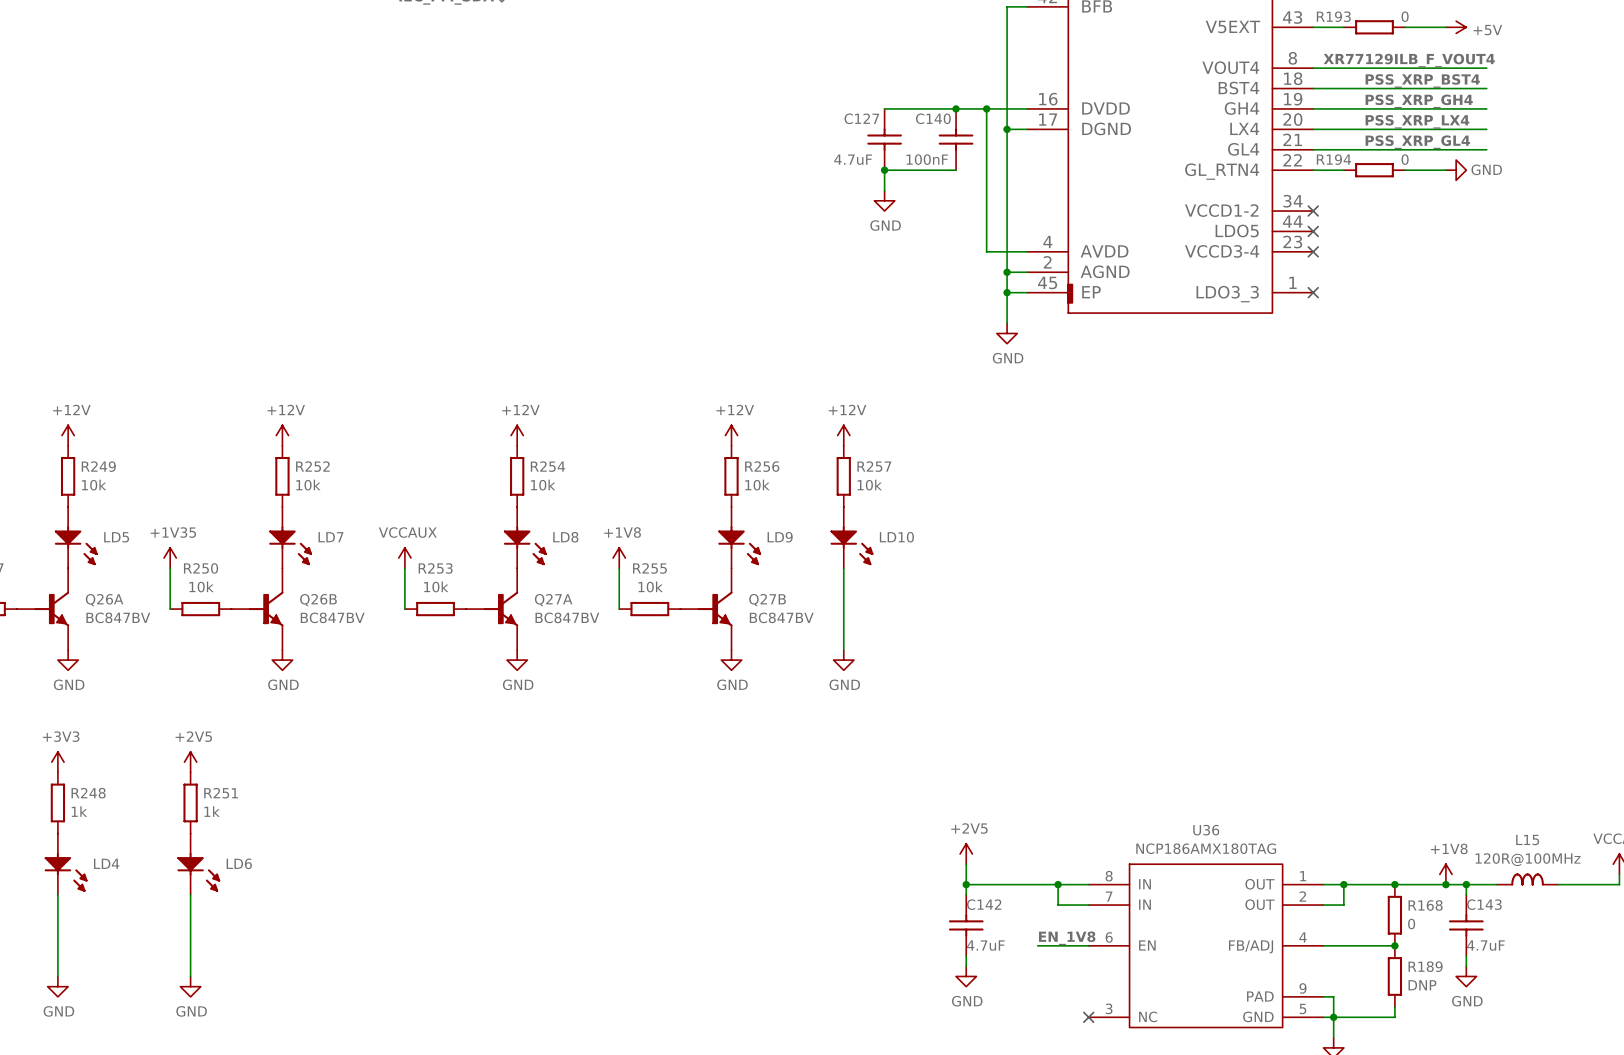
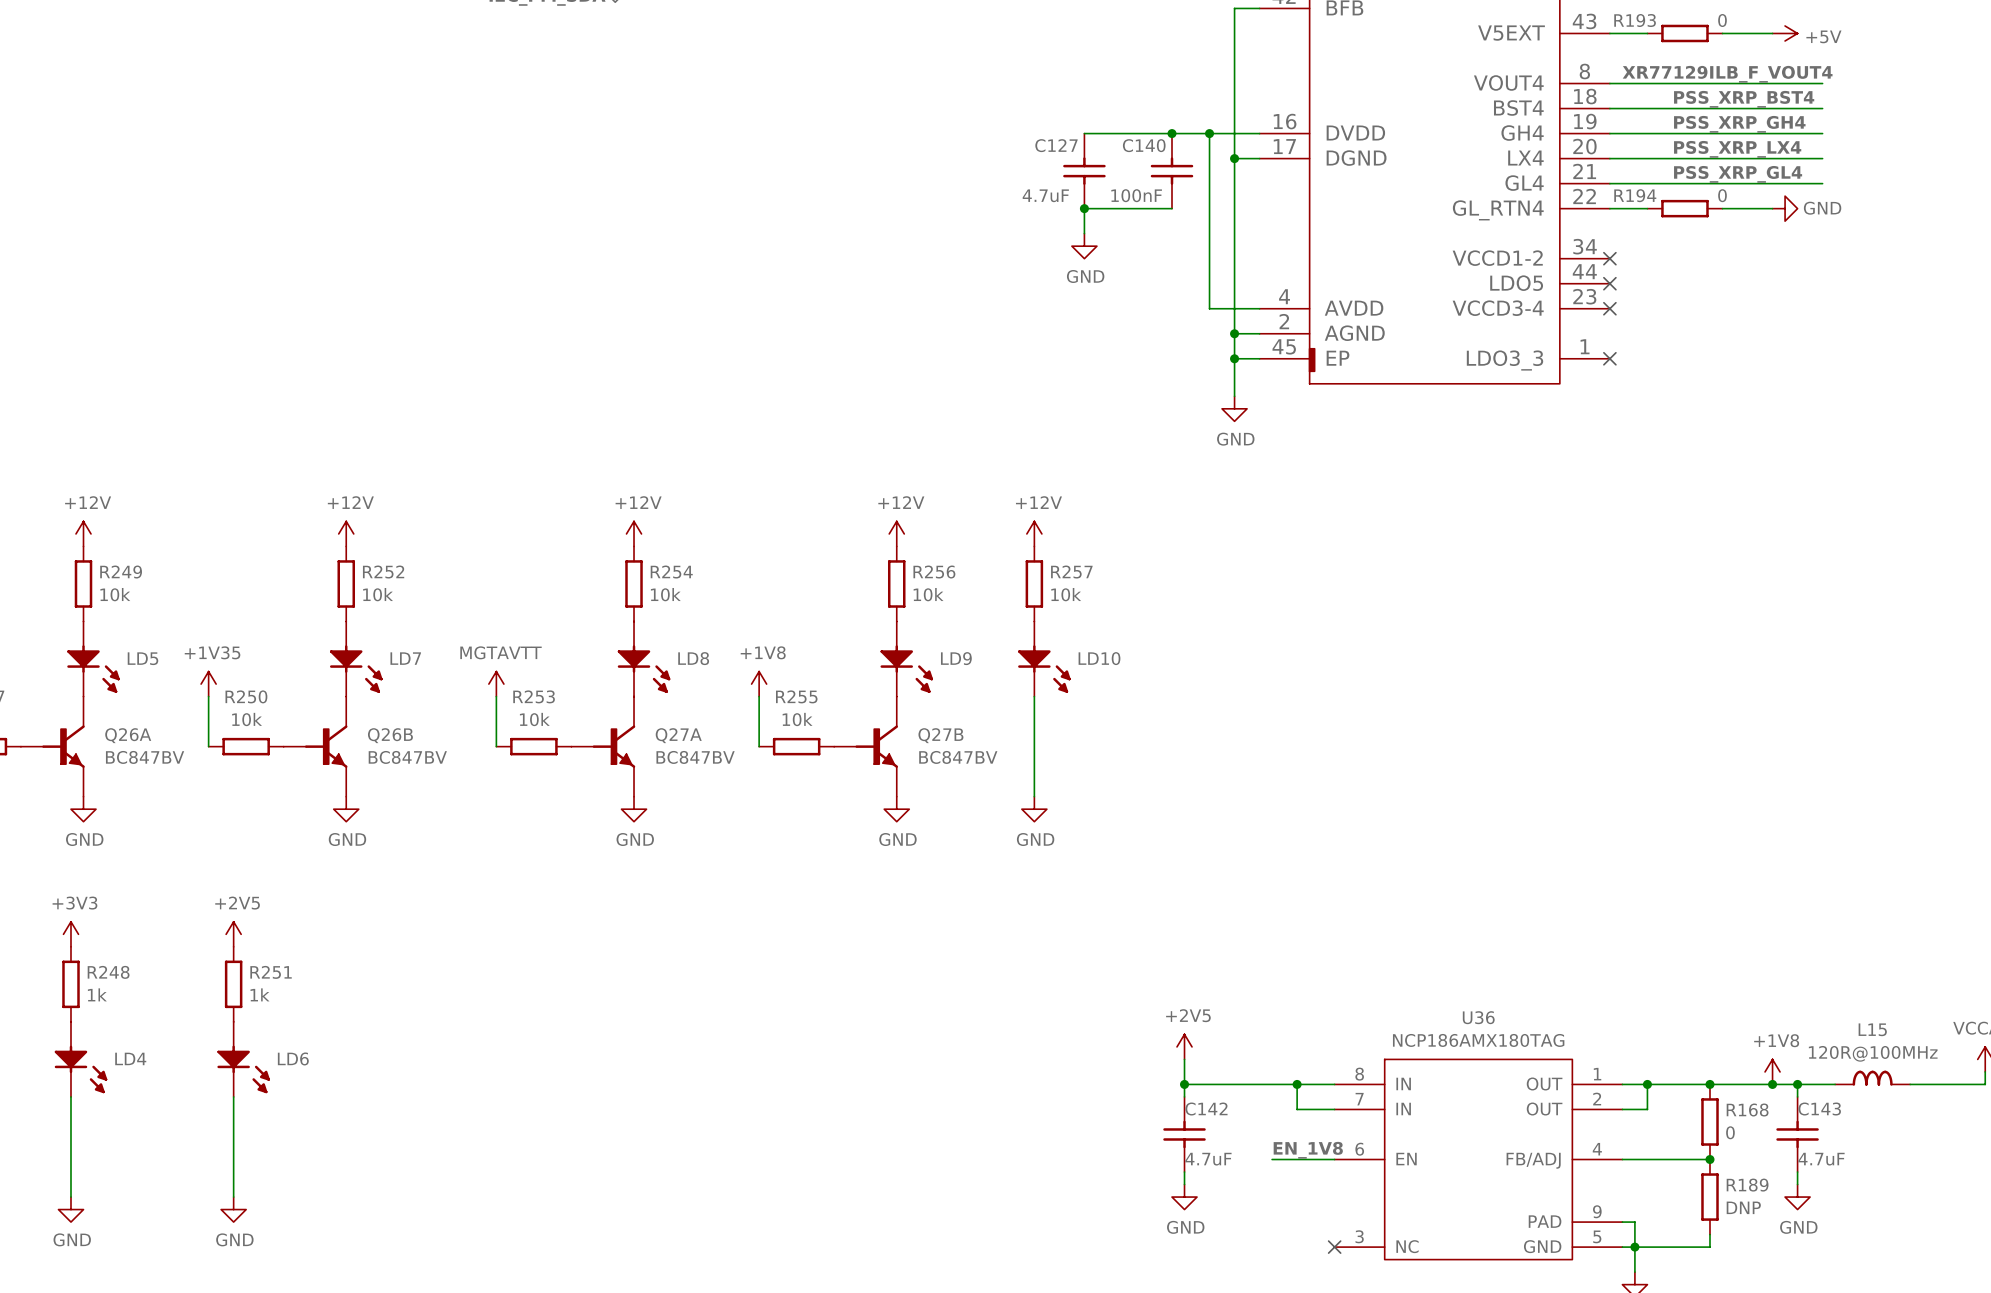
power symbol: VCCAUX (404, 558) -> MGTAVTT (496, 684)

